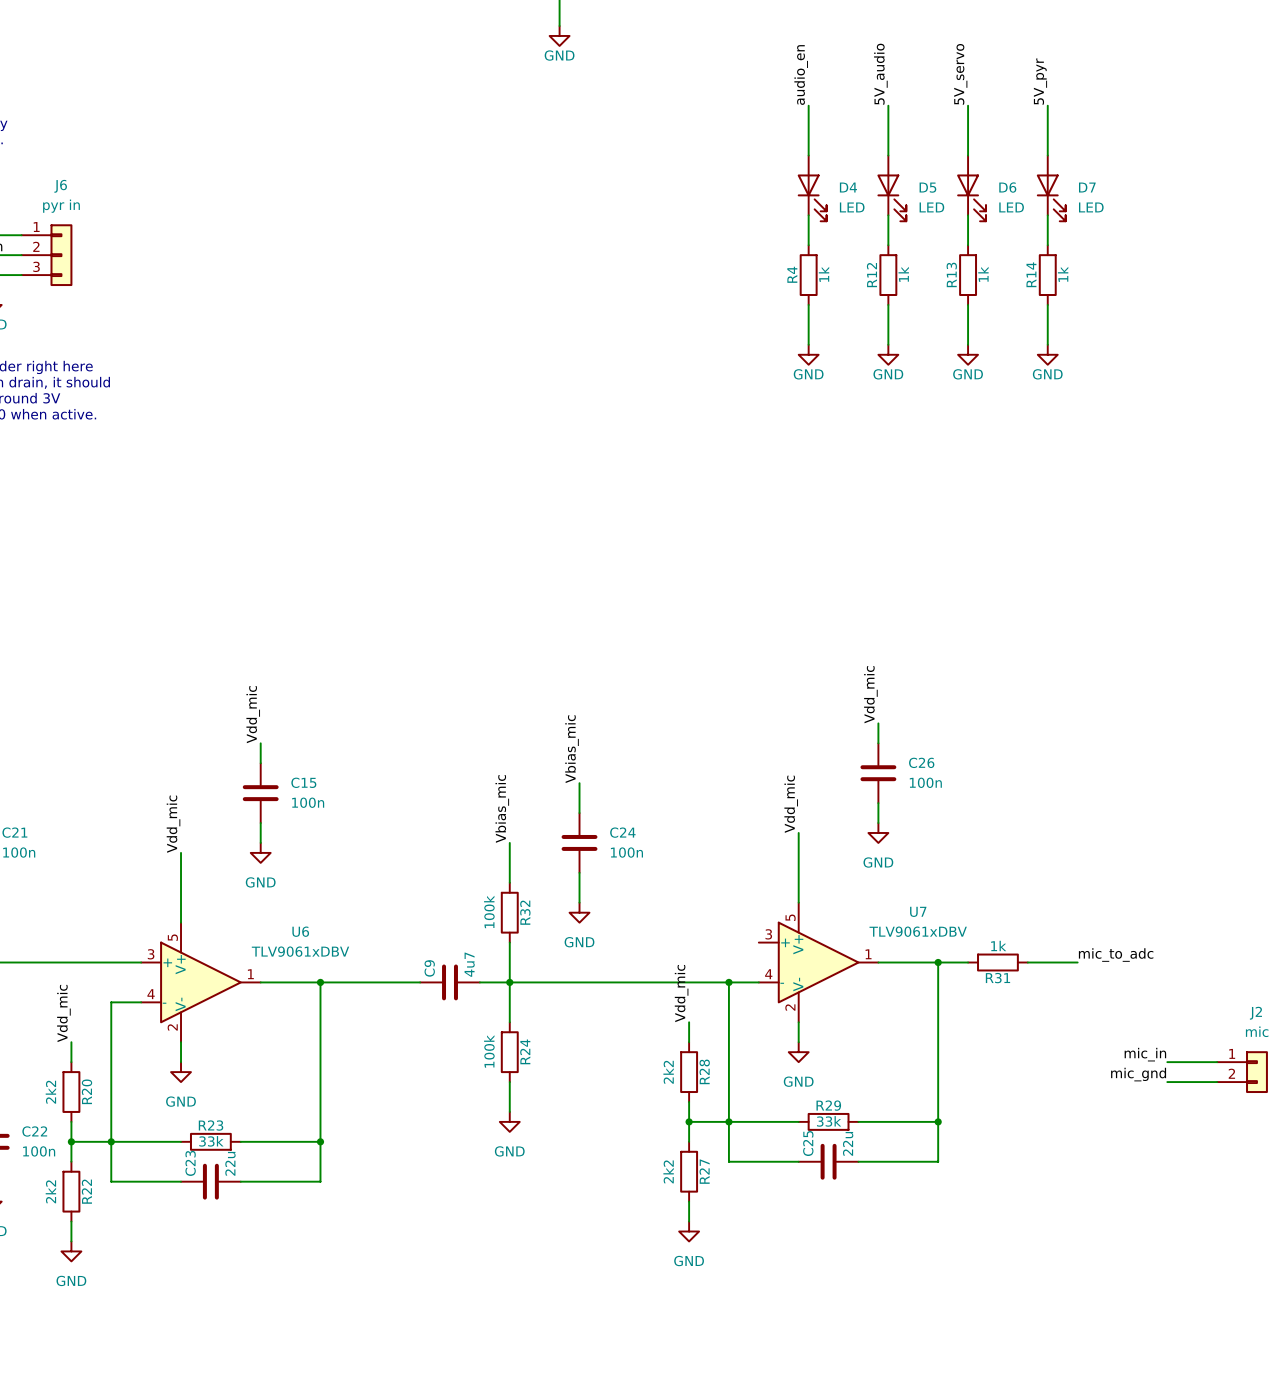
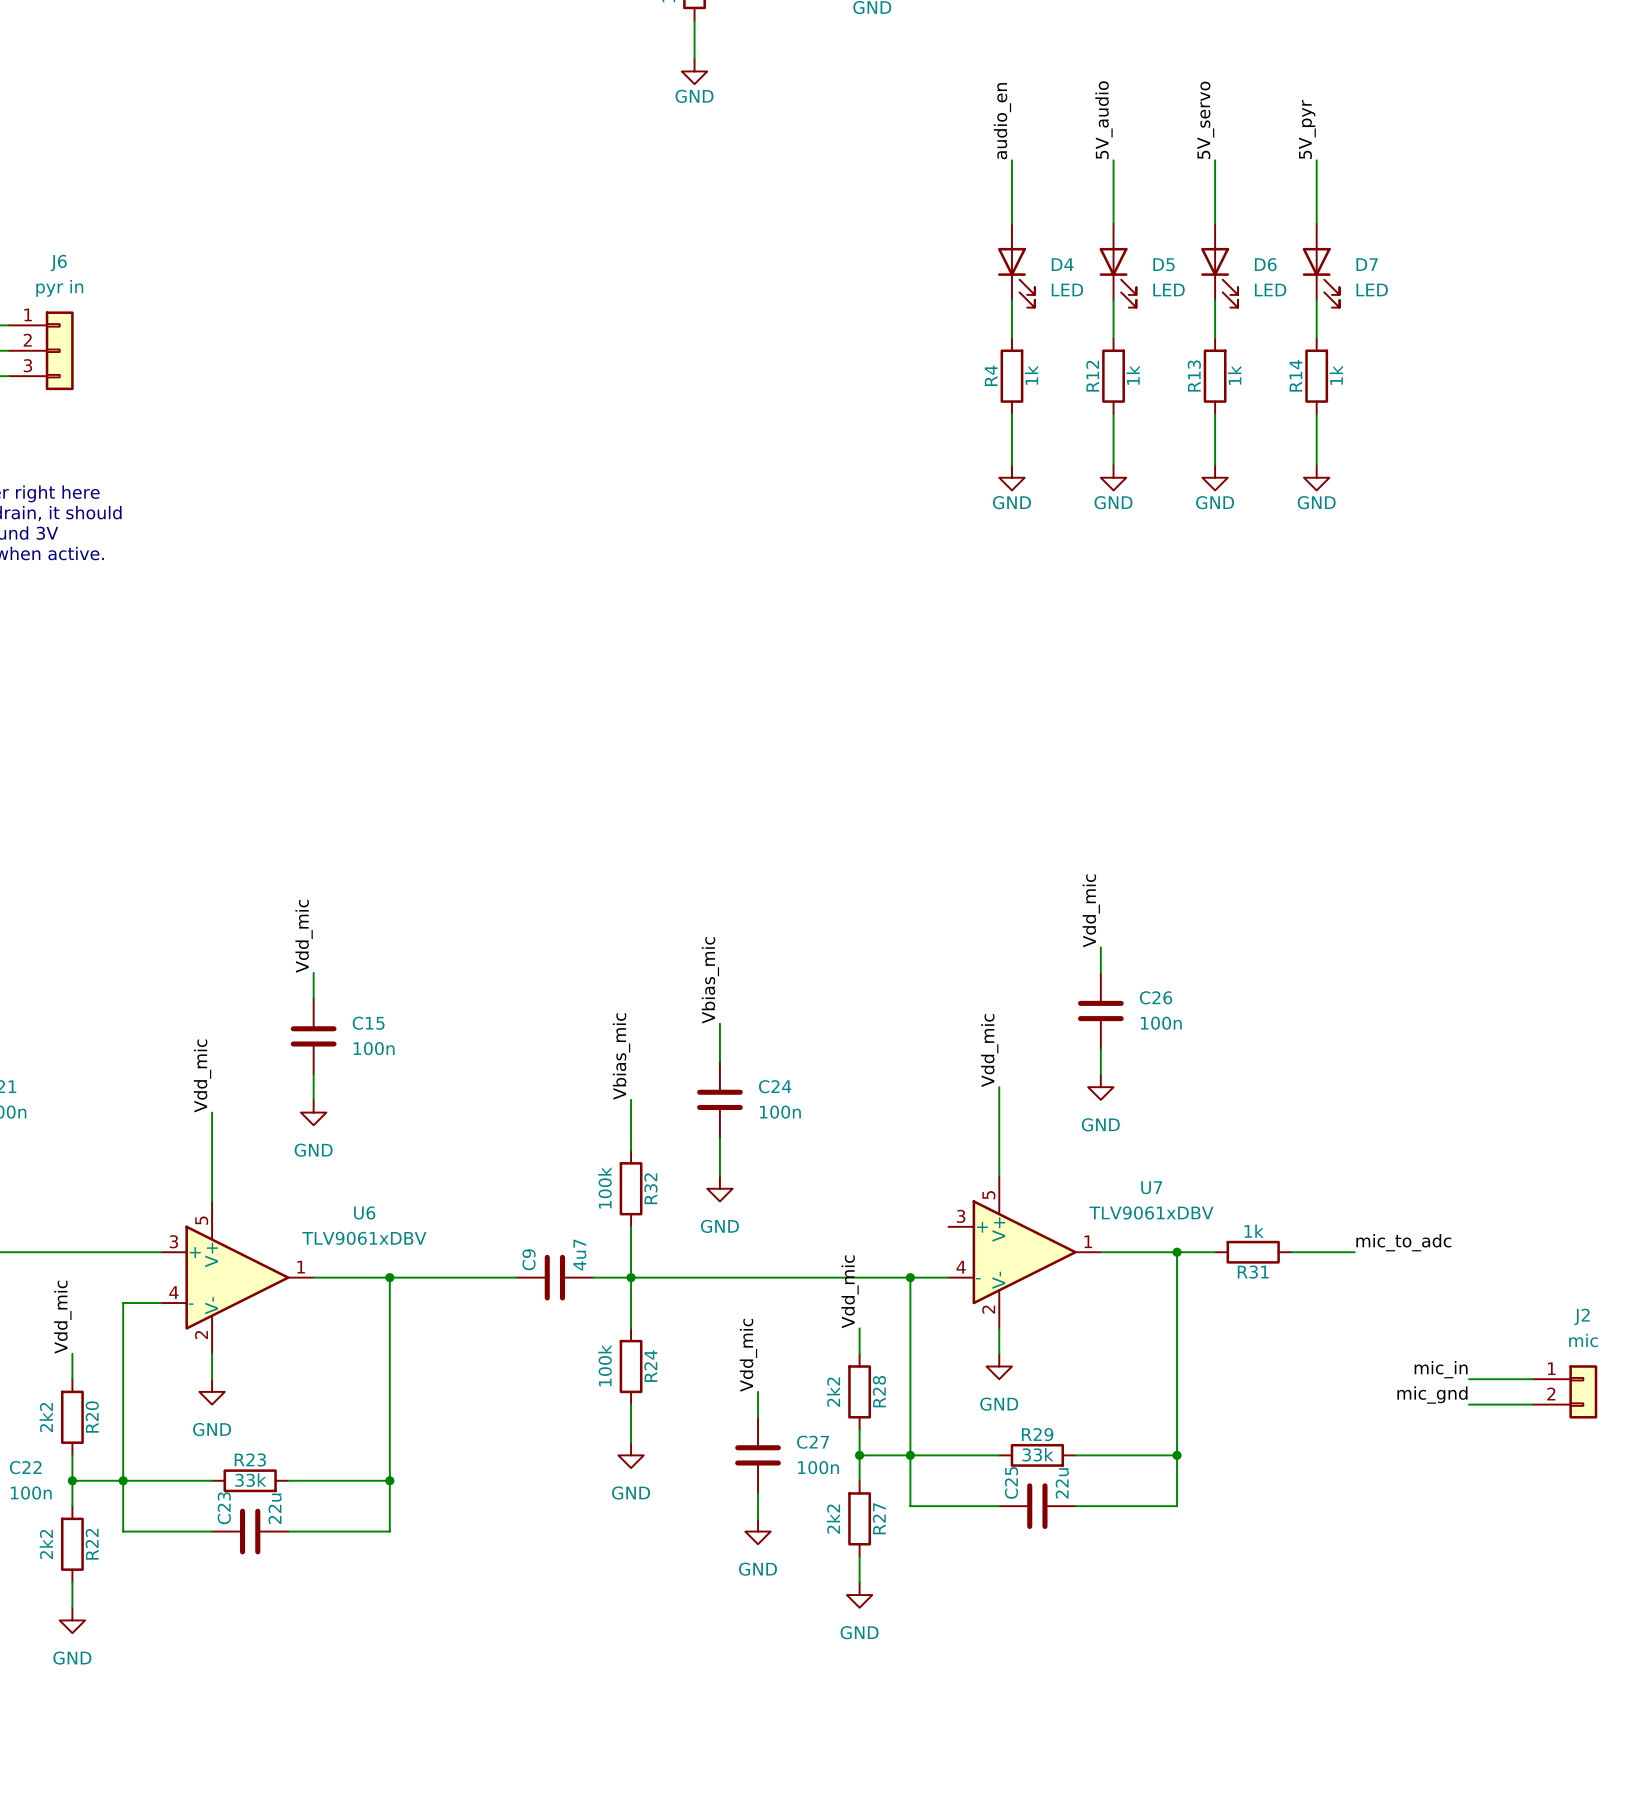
label: none -> Vdd_mic (748, 1355)
wire: none -> (758, 1391) (758, 1417)
C27: none -> 100n (758, 1455)
wire: none -> (758, 1493) (758, 1518)
power symbol: none -> GND (758, 1531)

